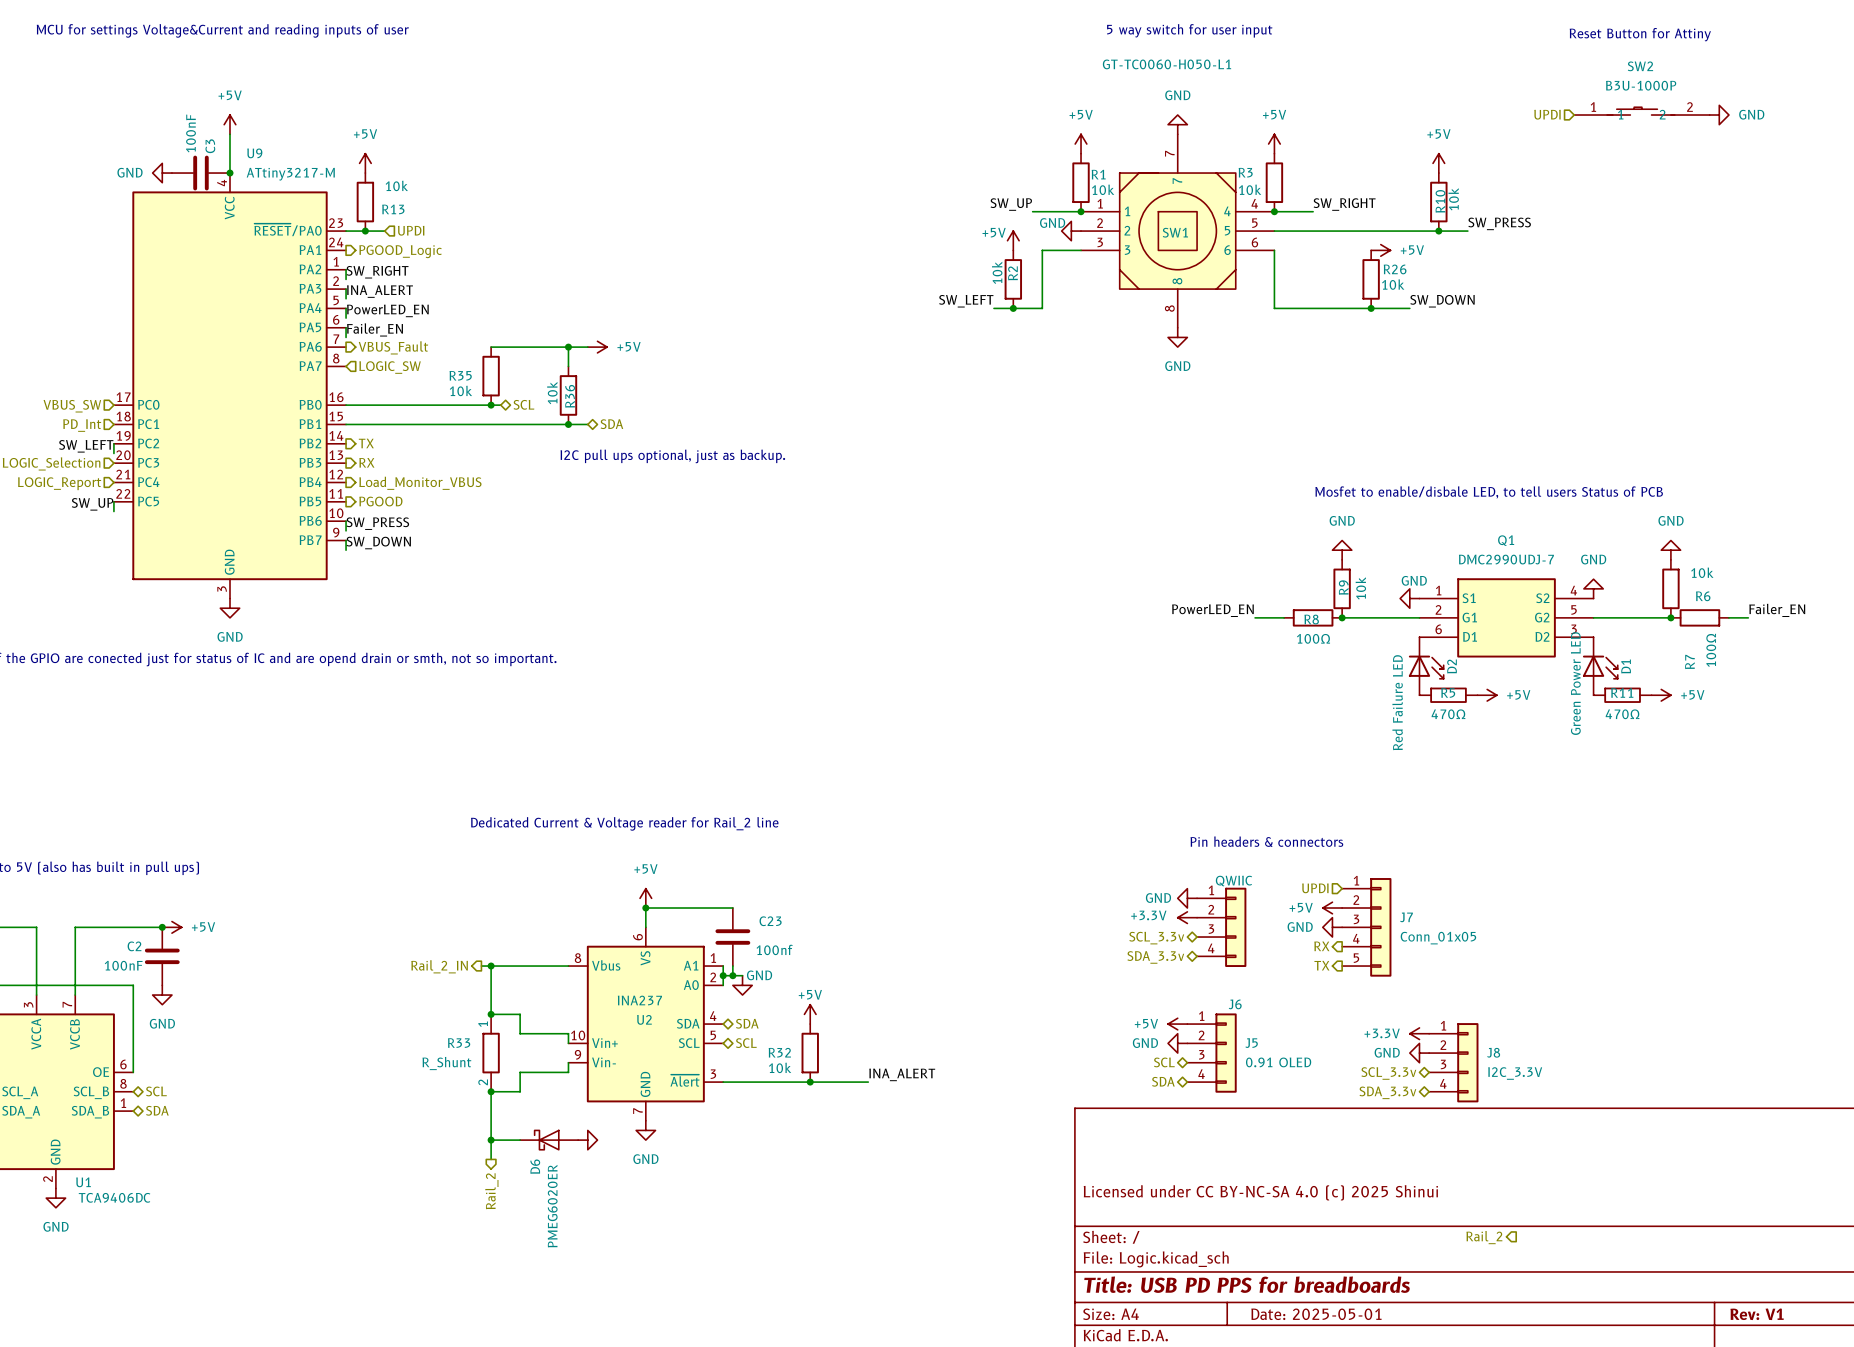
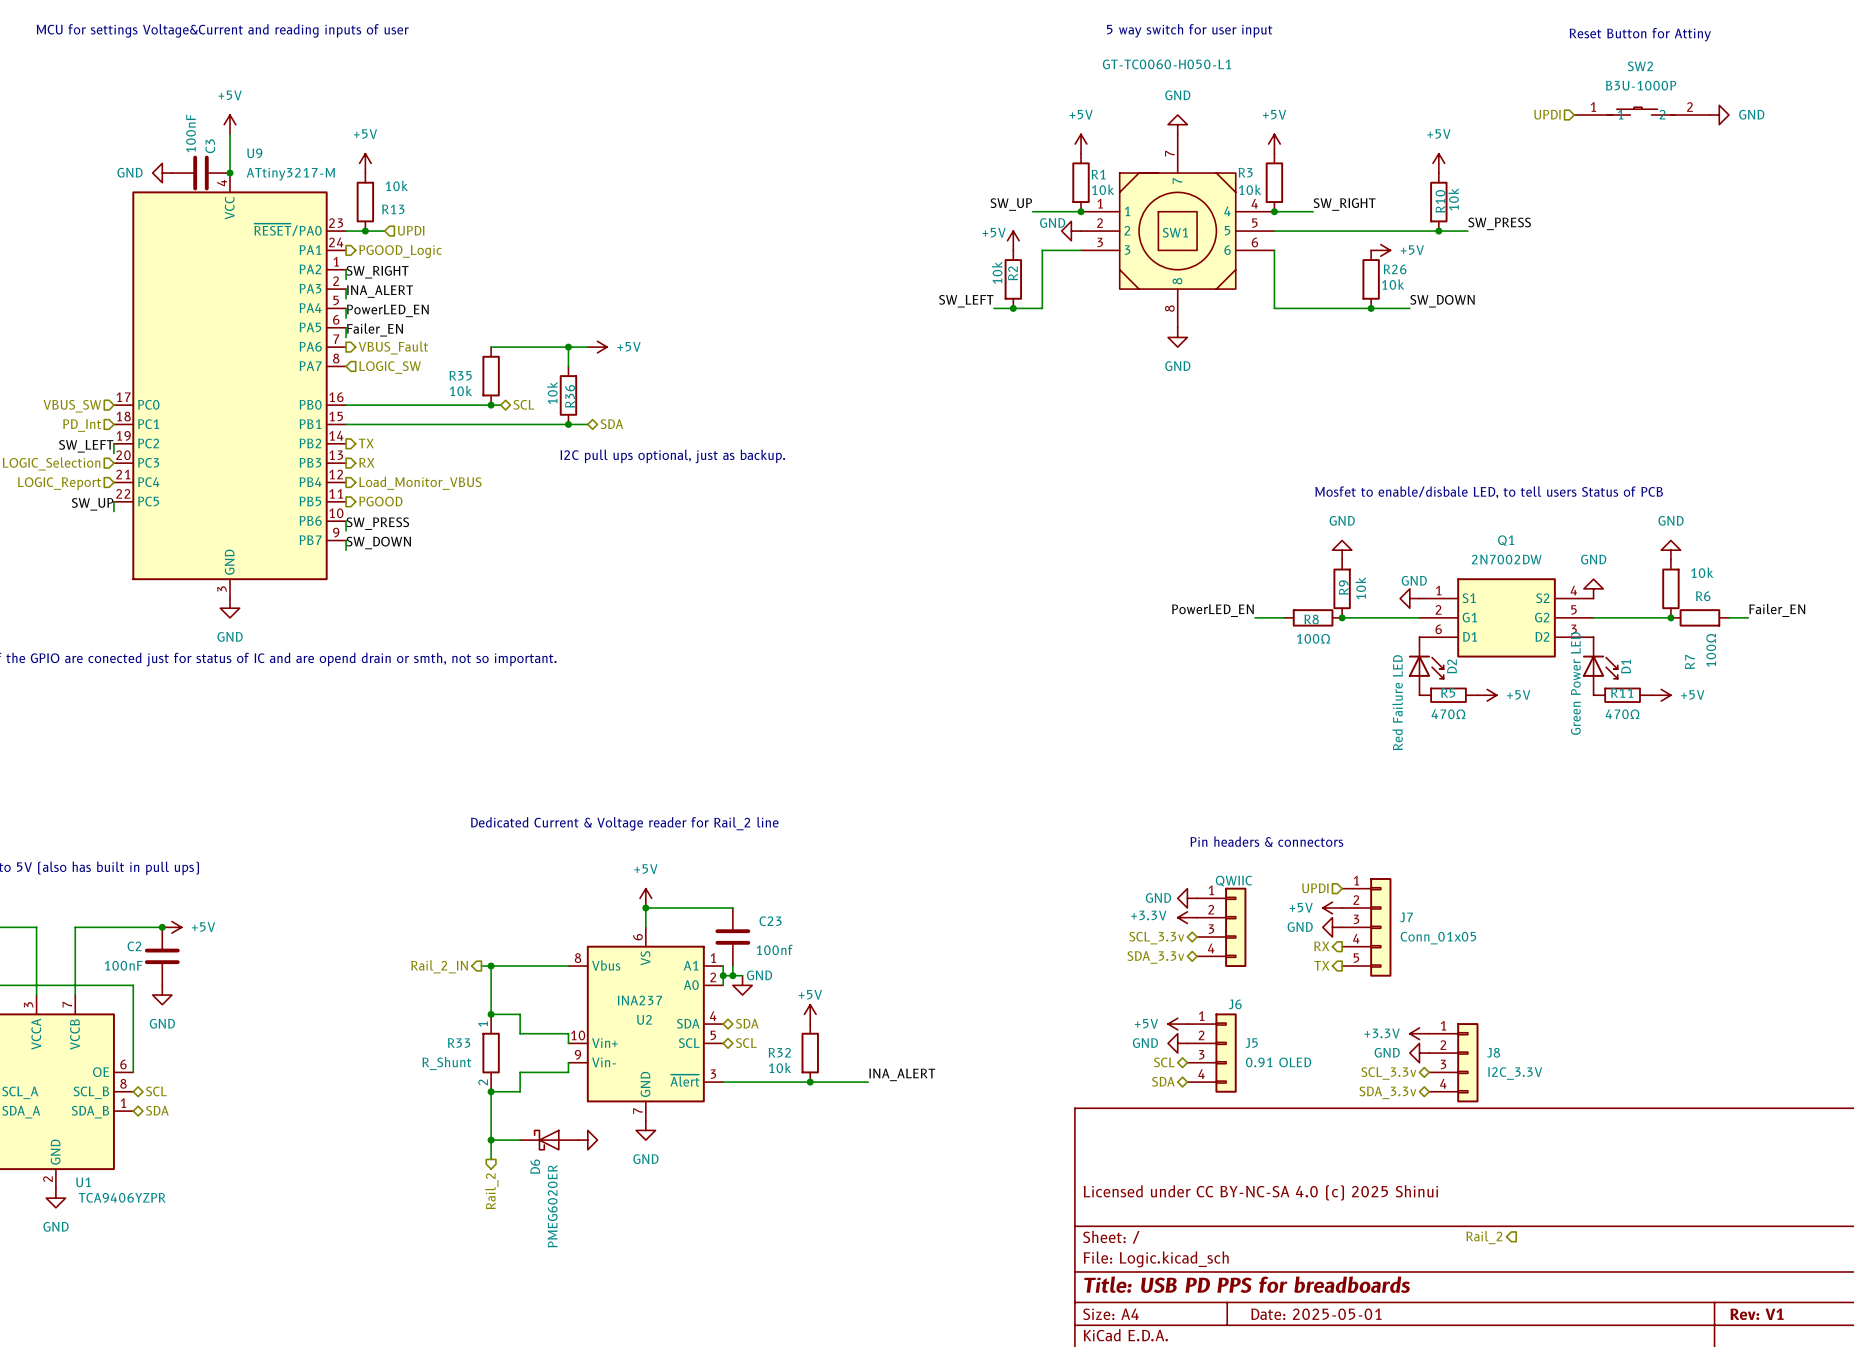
Q1 value: DMC2990UDJ-7 (1506, 559) -> 2N7002DW (1506, 559)
U1 value: TCA9406DC (114, 1197) -> TCA9406YZPR (122, 1197)

